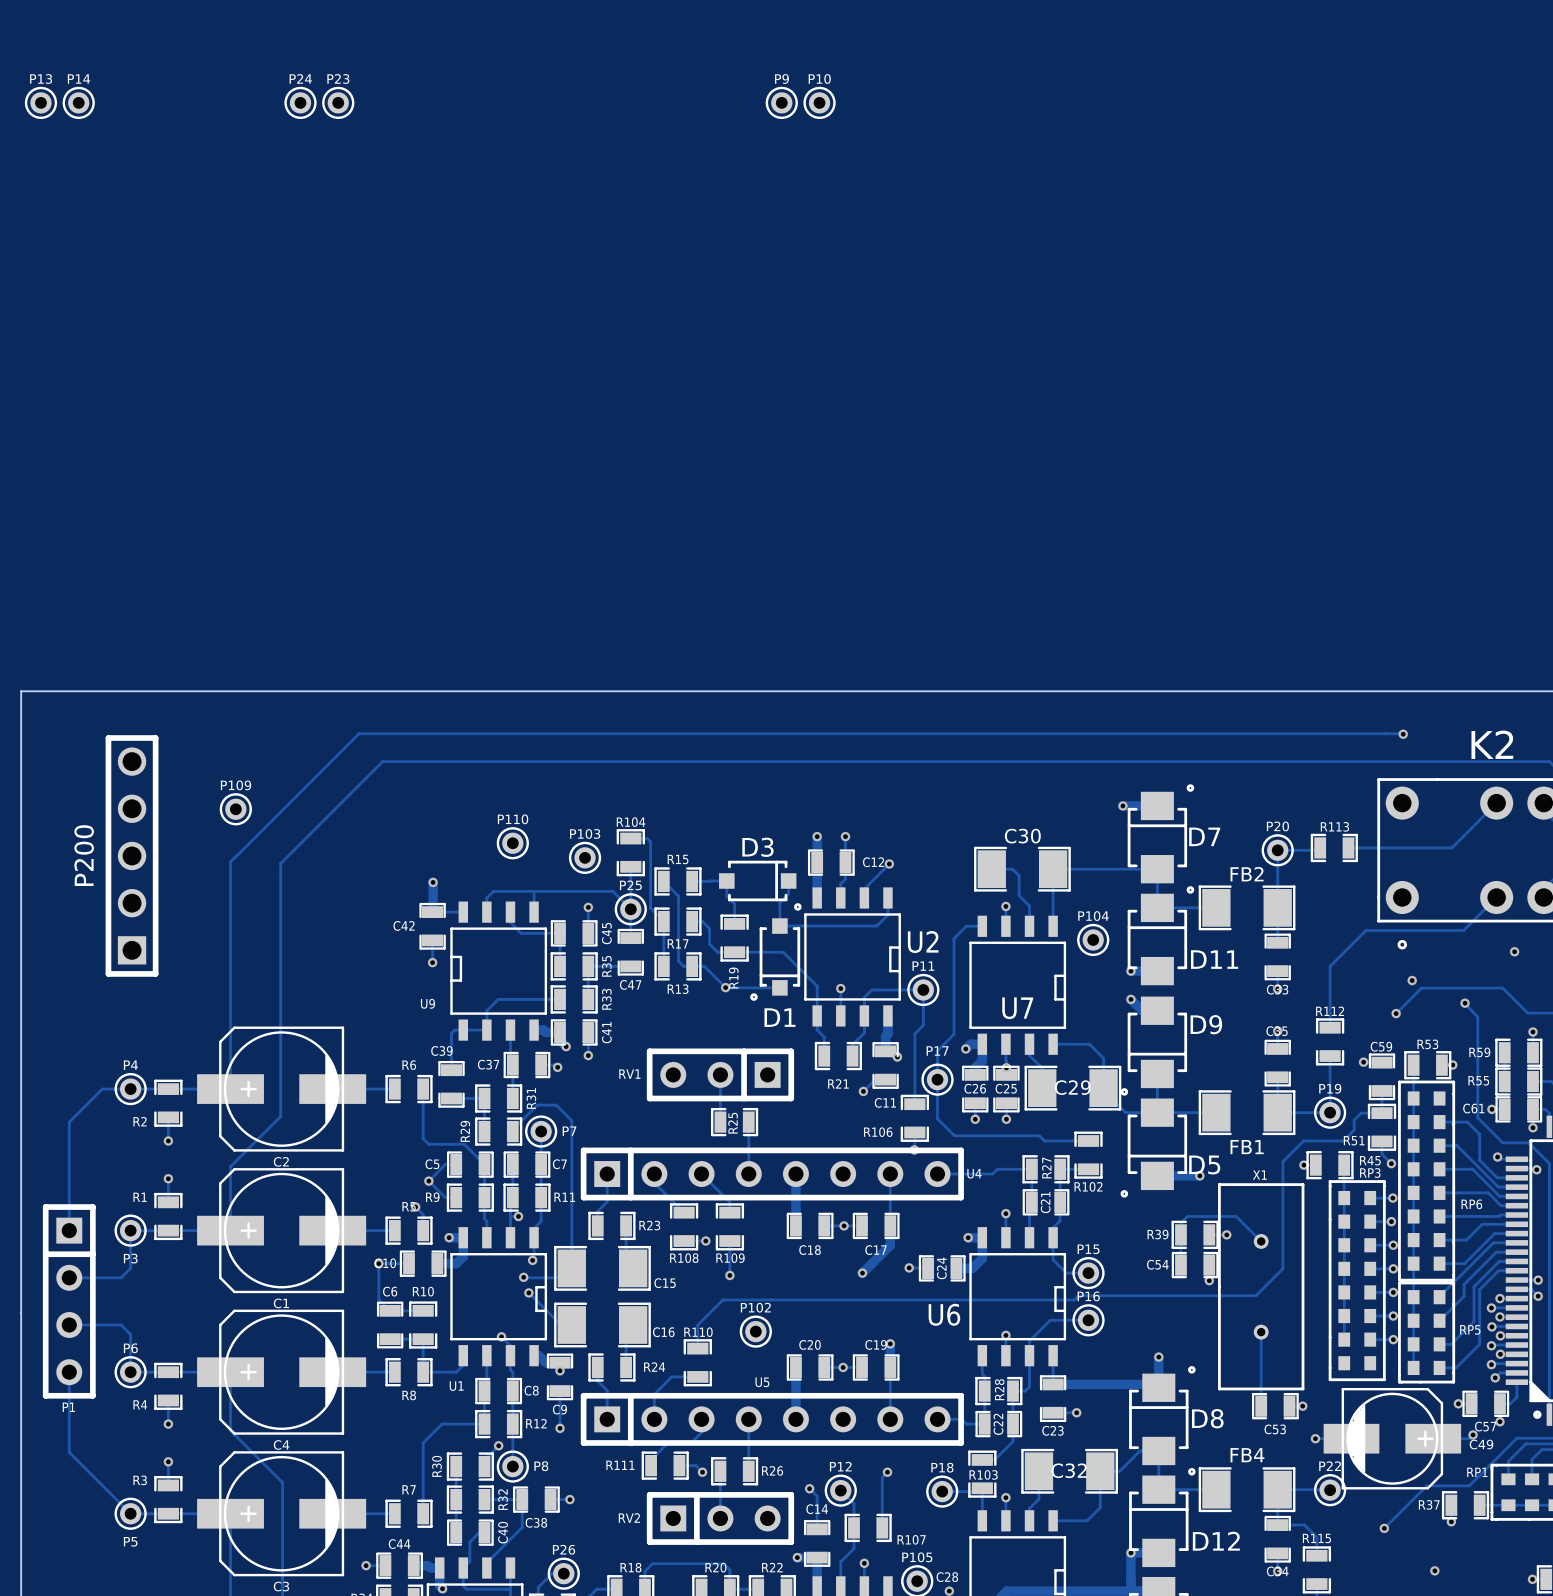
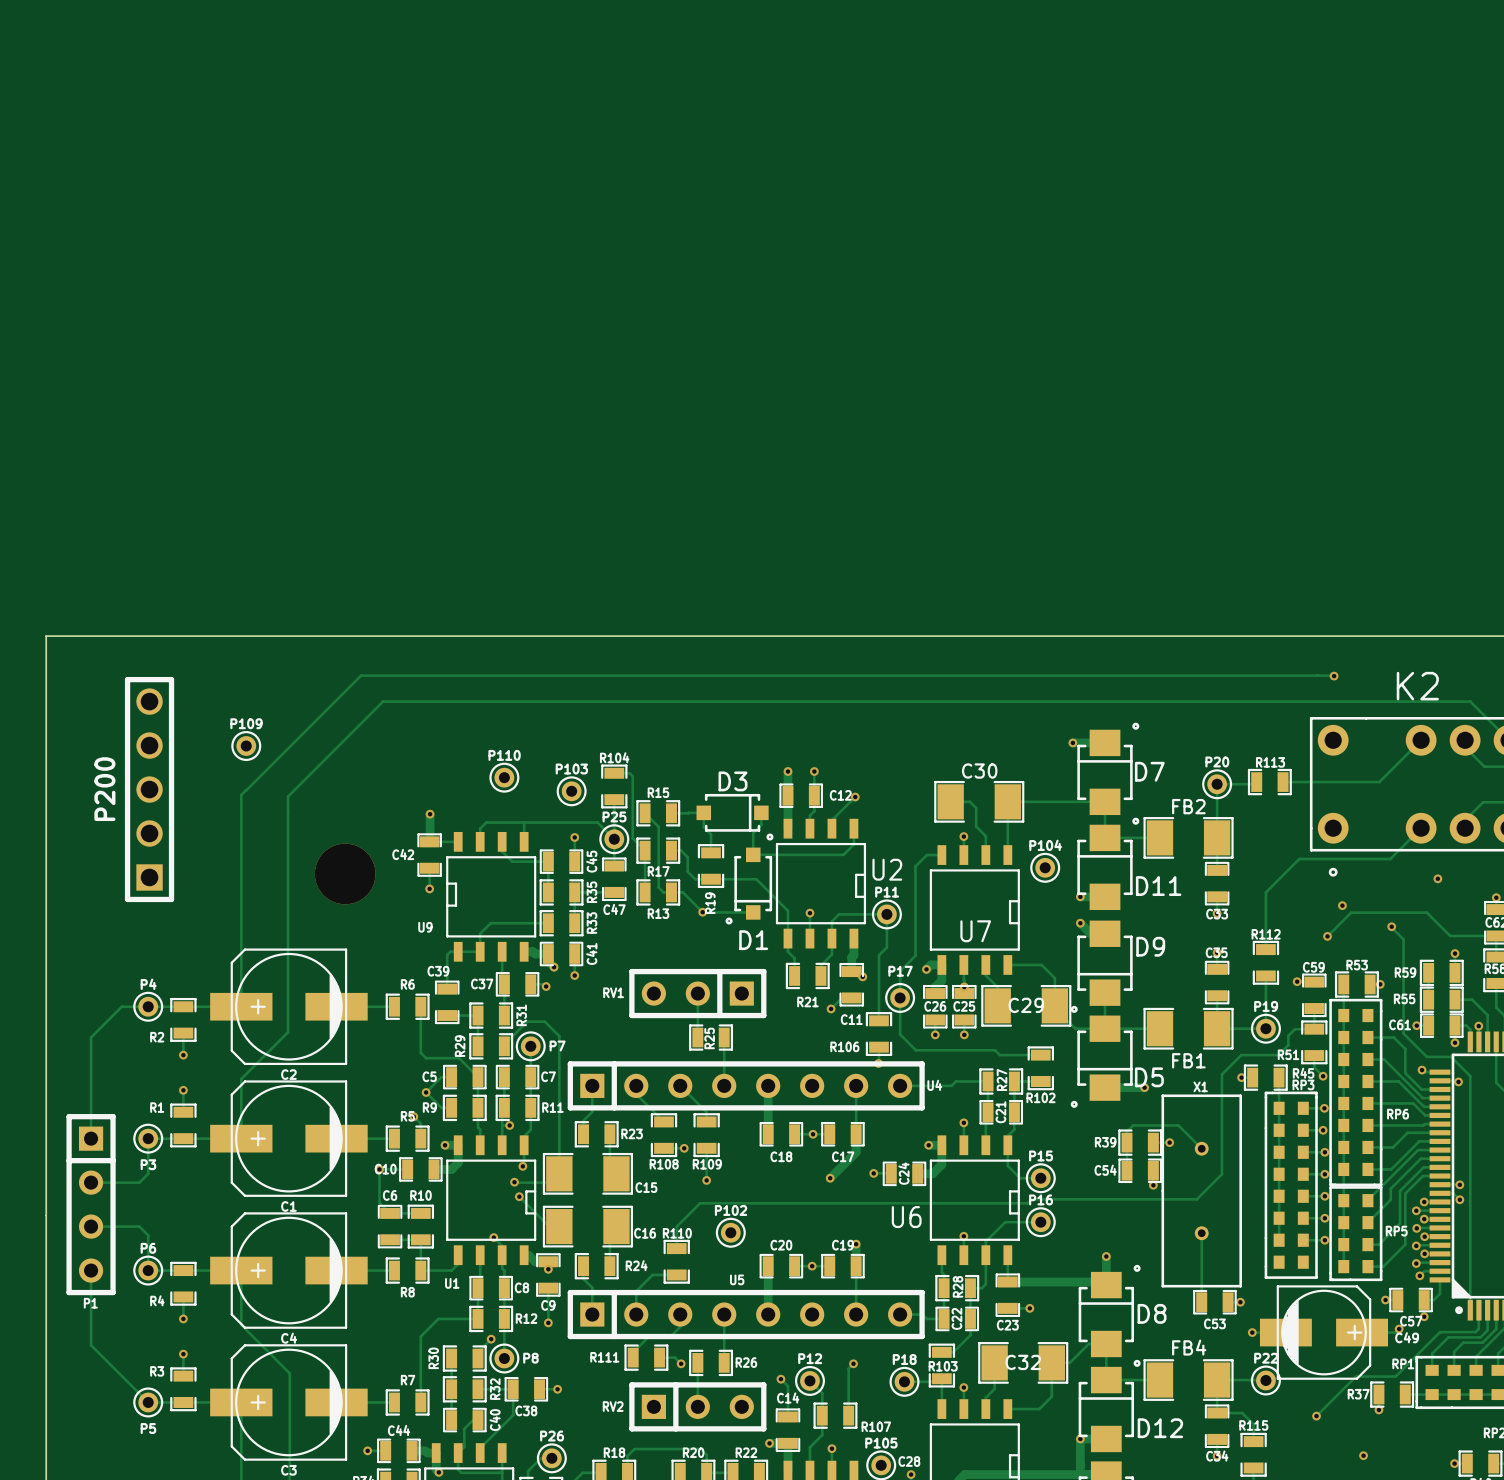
P13: (40, 102) -> none
P14: (78, 102) -> none
P24: (300, 102) -> none
P23: (338, 102) -> none
P9: (781, 102) -> none
P10: (819, 102) -> none
part: none -> (345, 873)

